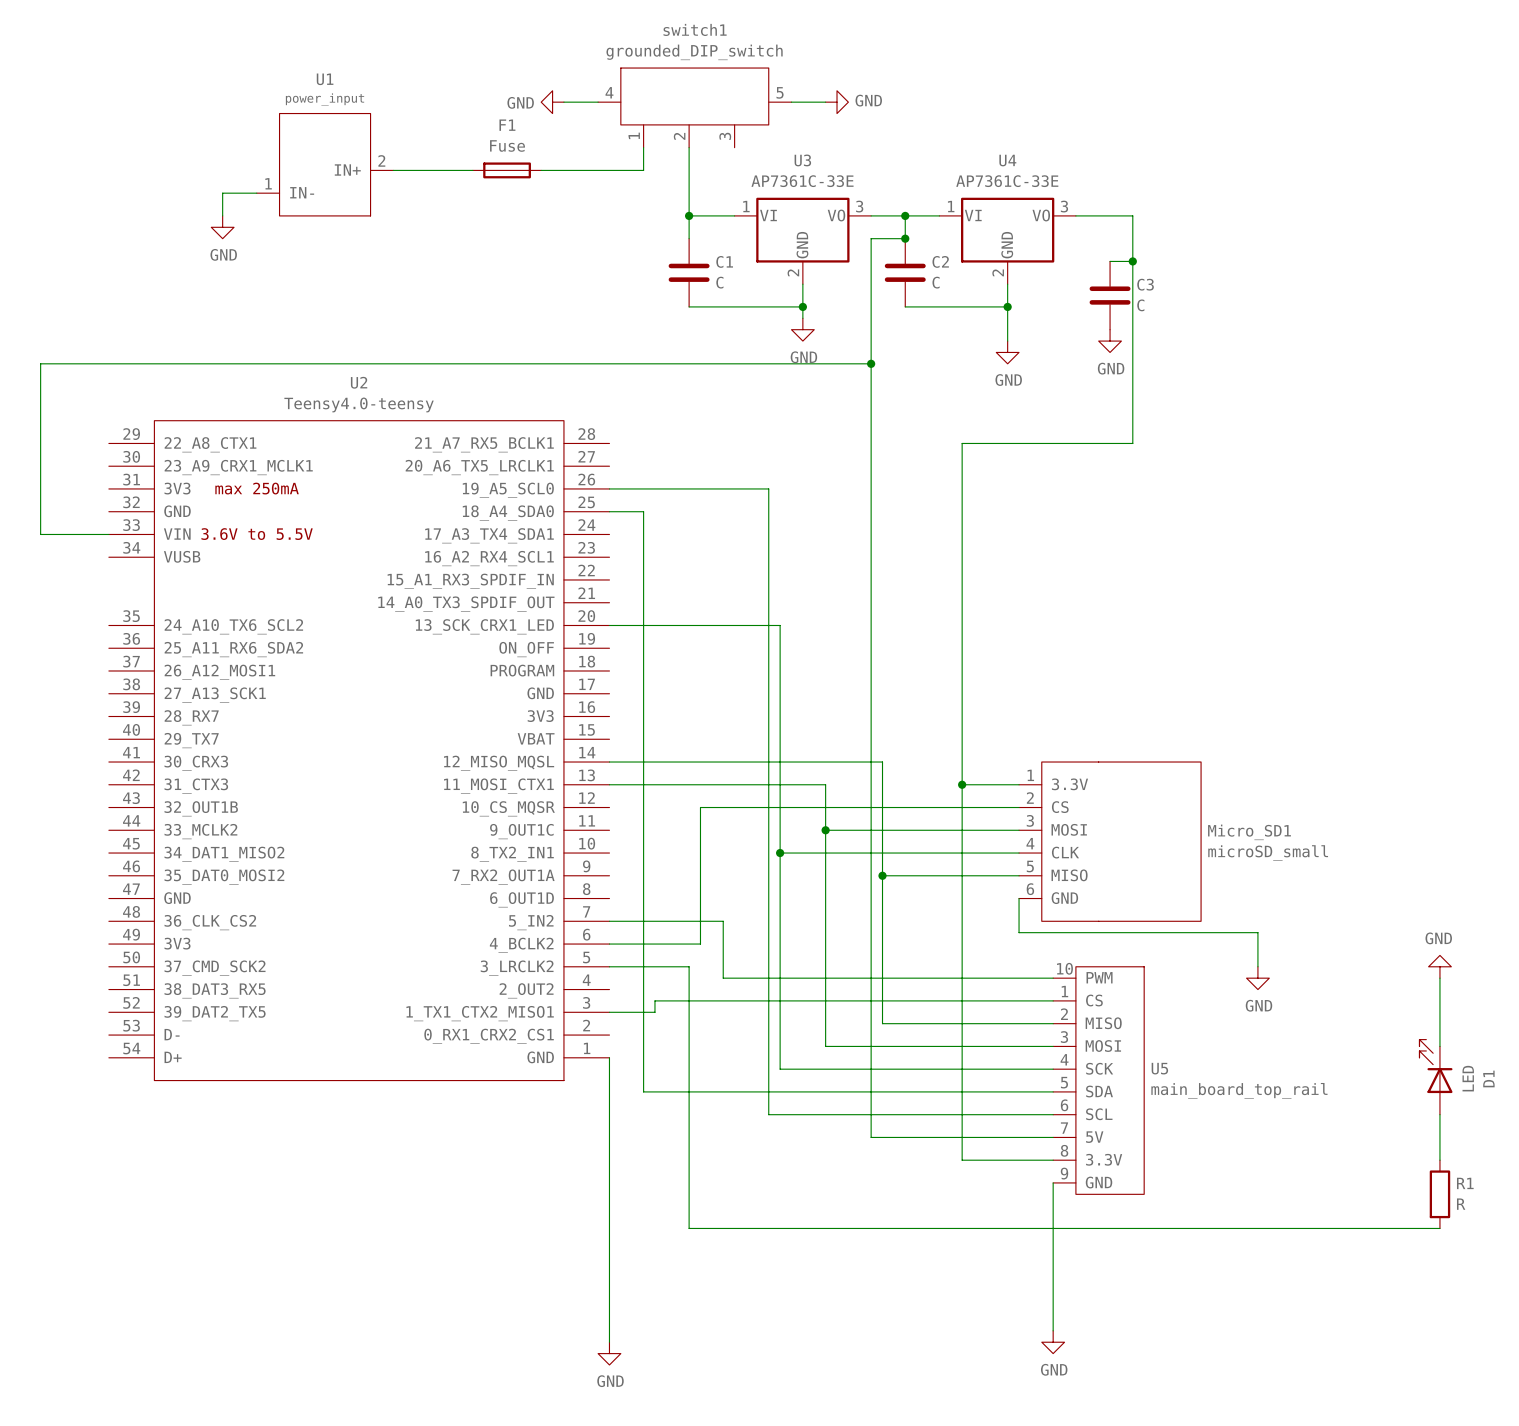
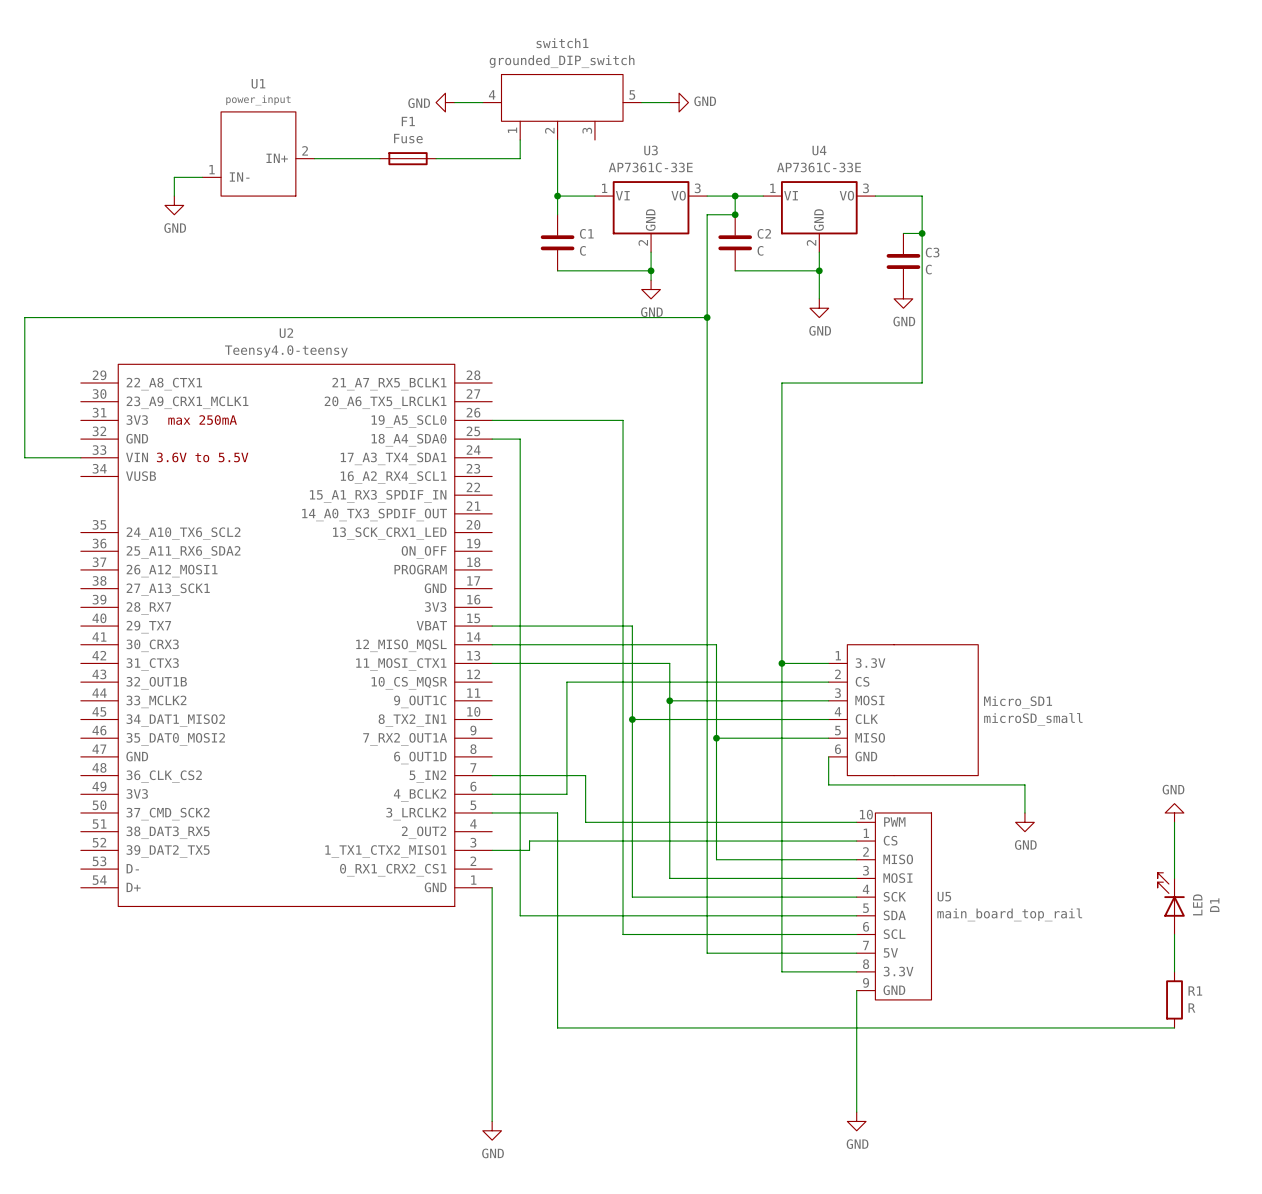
wire: (609, 625) (780, 625) (780, 739) -> (492, 626) (632, 626)

